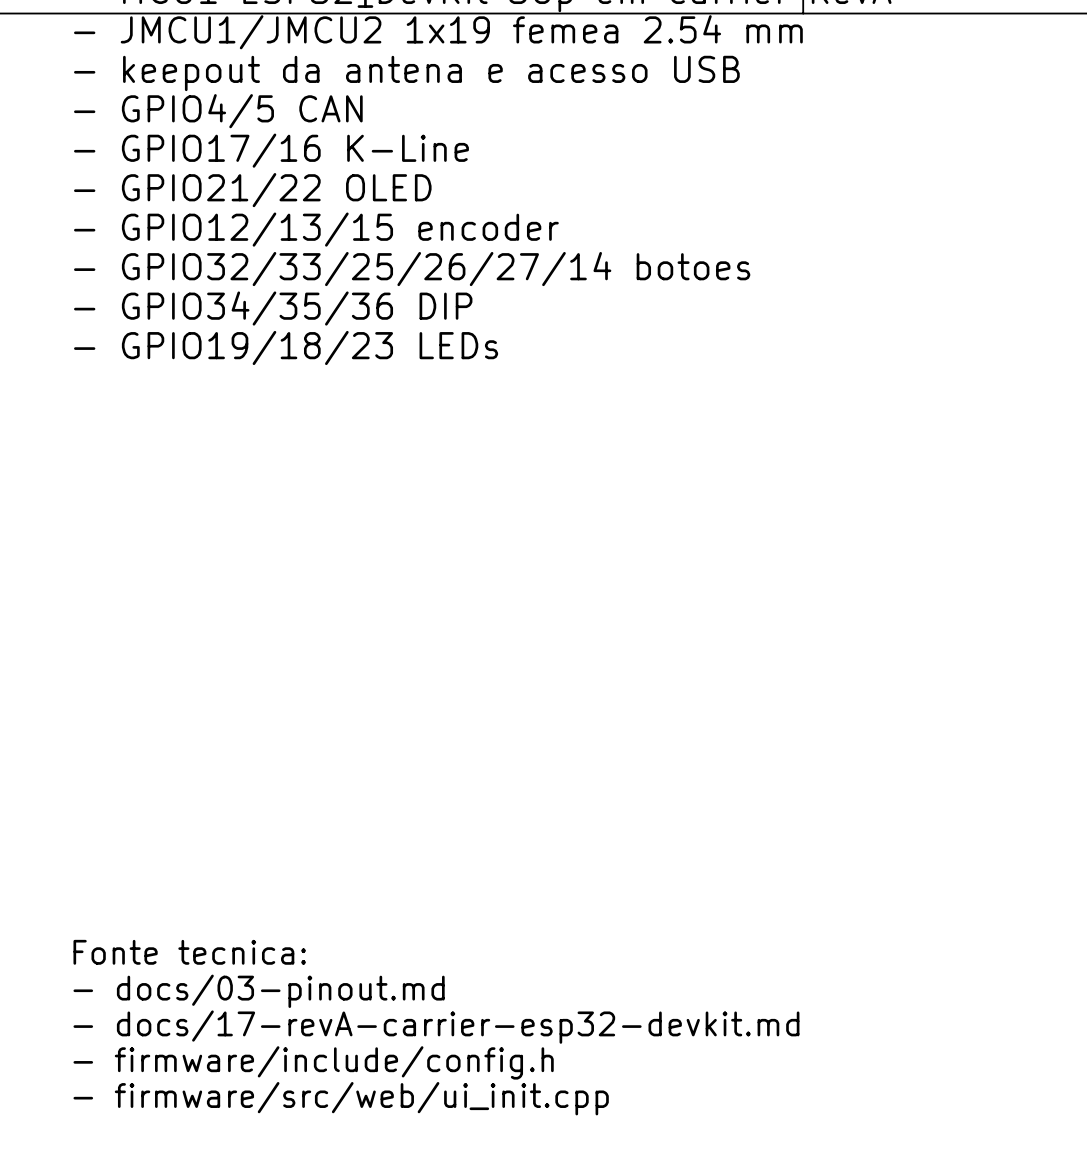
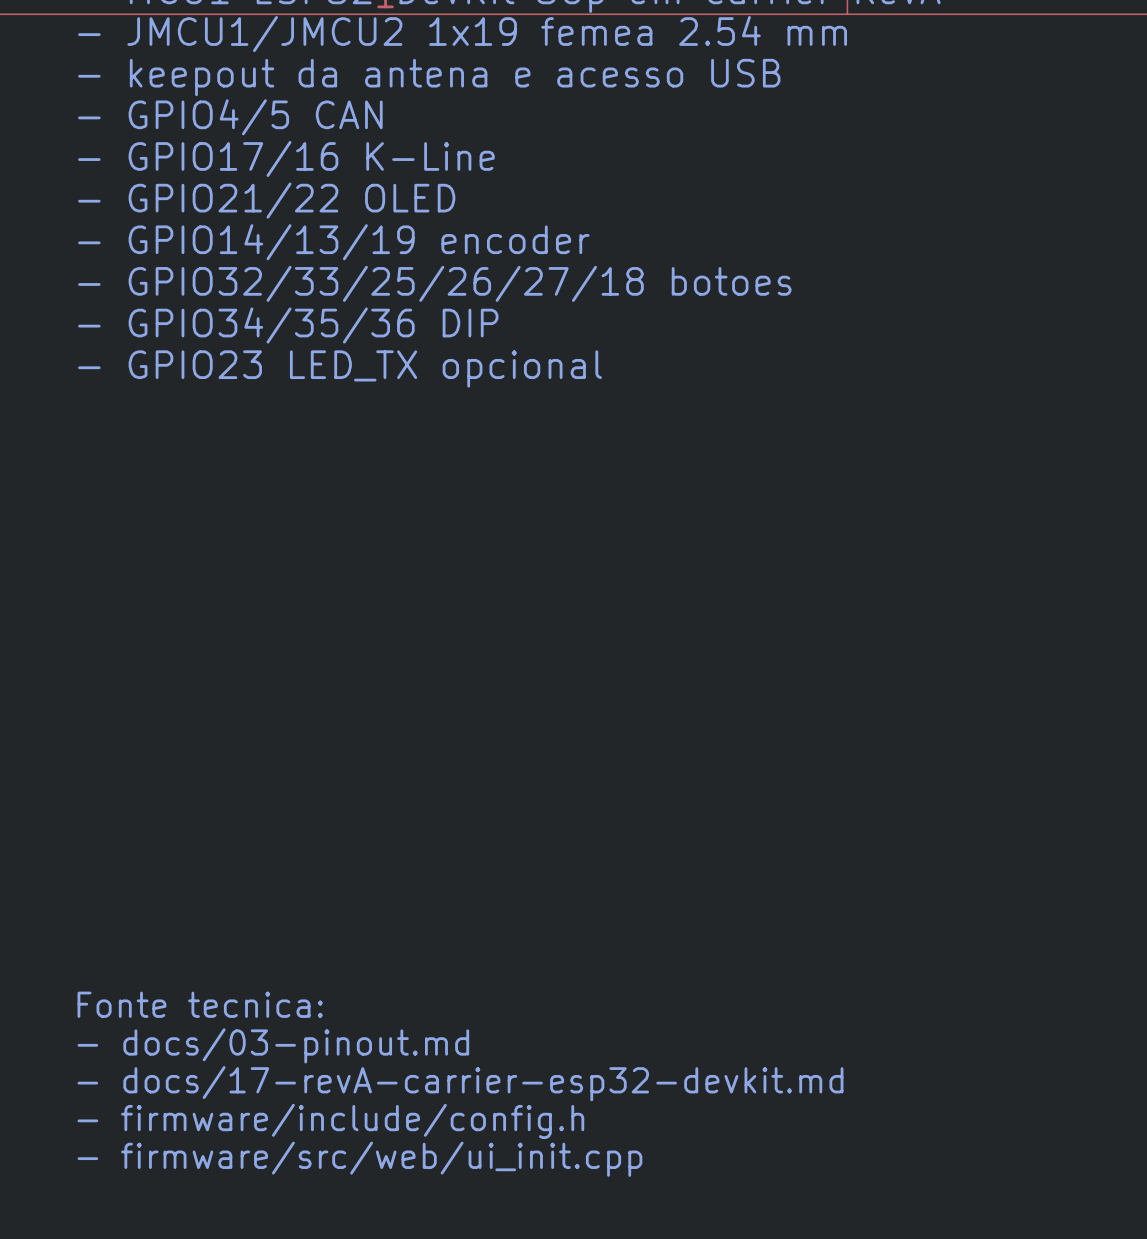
text: - GPIO12/13/15 encoder (316, 229) -> - GPIO14/13/19 encoder (333, 242)
text: - GPIO32/33/25/26/27/14 botoes (412, 269) -> - GPIO32/33/25/26/27/18 botoes (434, 283)
text: - GPIO19/18/23 LEDs (286, 347) -> - GPIO23 LED_TX opcional (339, 368)

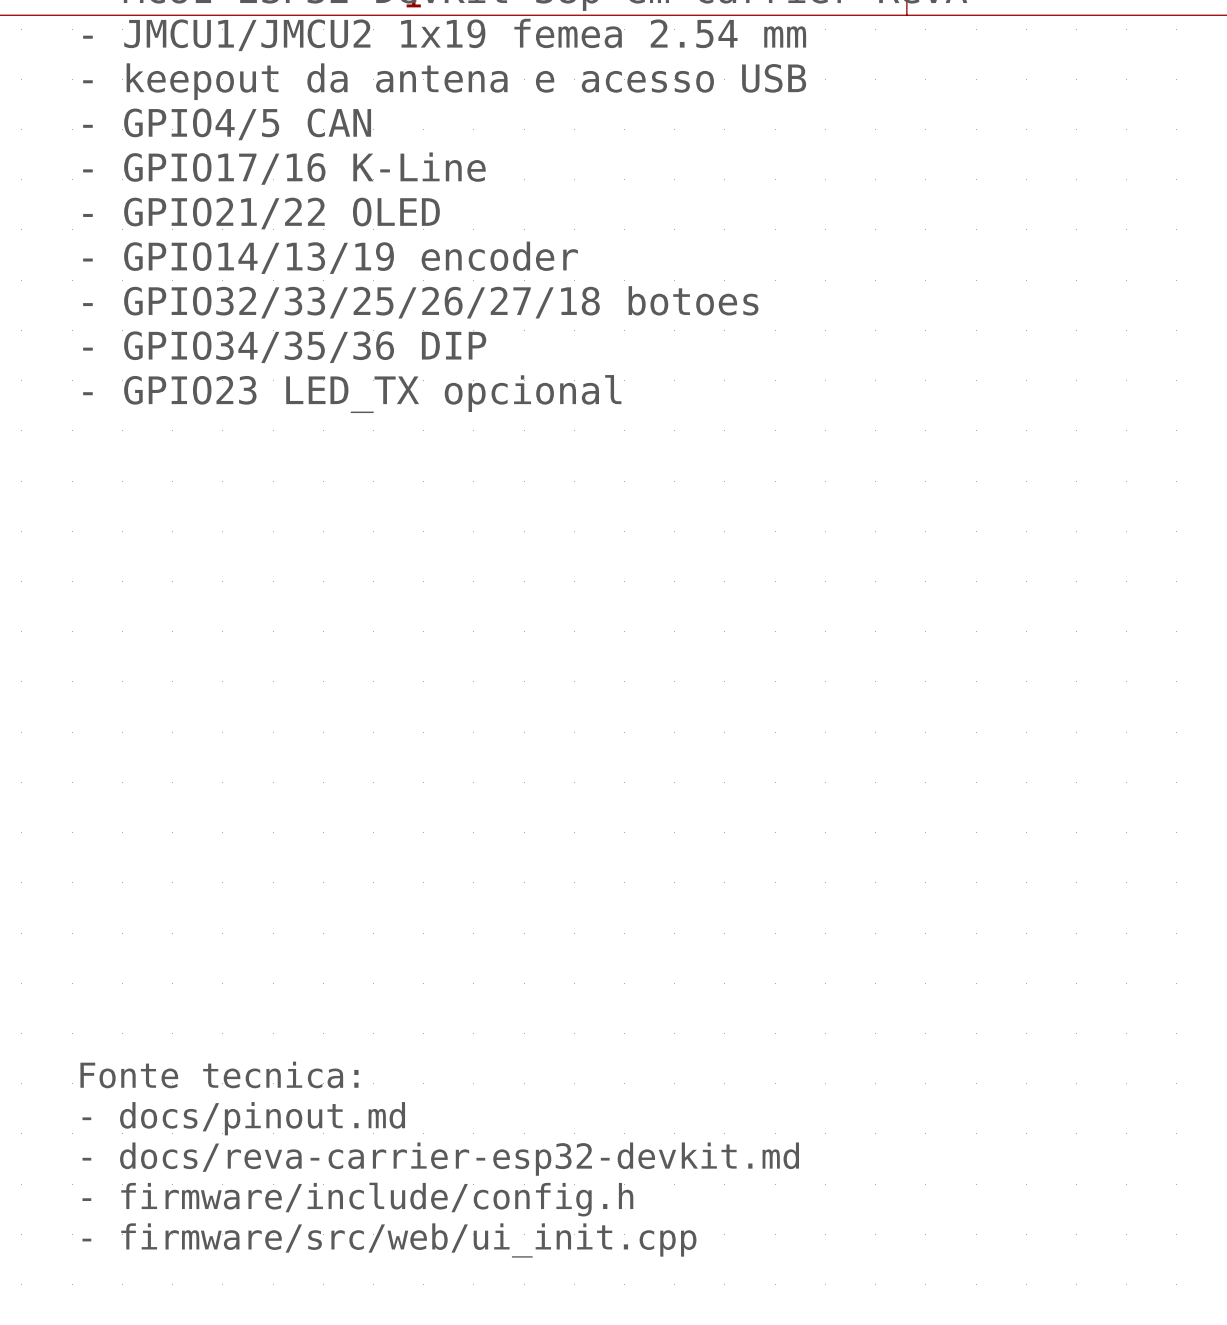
text: - docs/03-pinout.md (273, 1045) -> - docs/pinout.md (243, 1118)
text: - docs/17-revA-carrier-esp32-devkit.md (460, 1083) -> - docs/reva-carrier-esp32-devkit.md (440, 1159)

